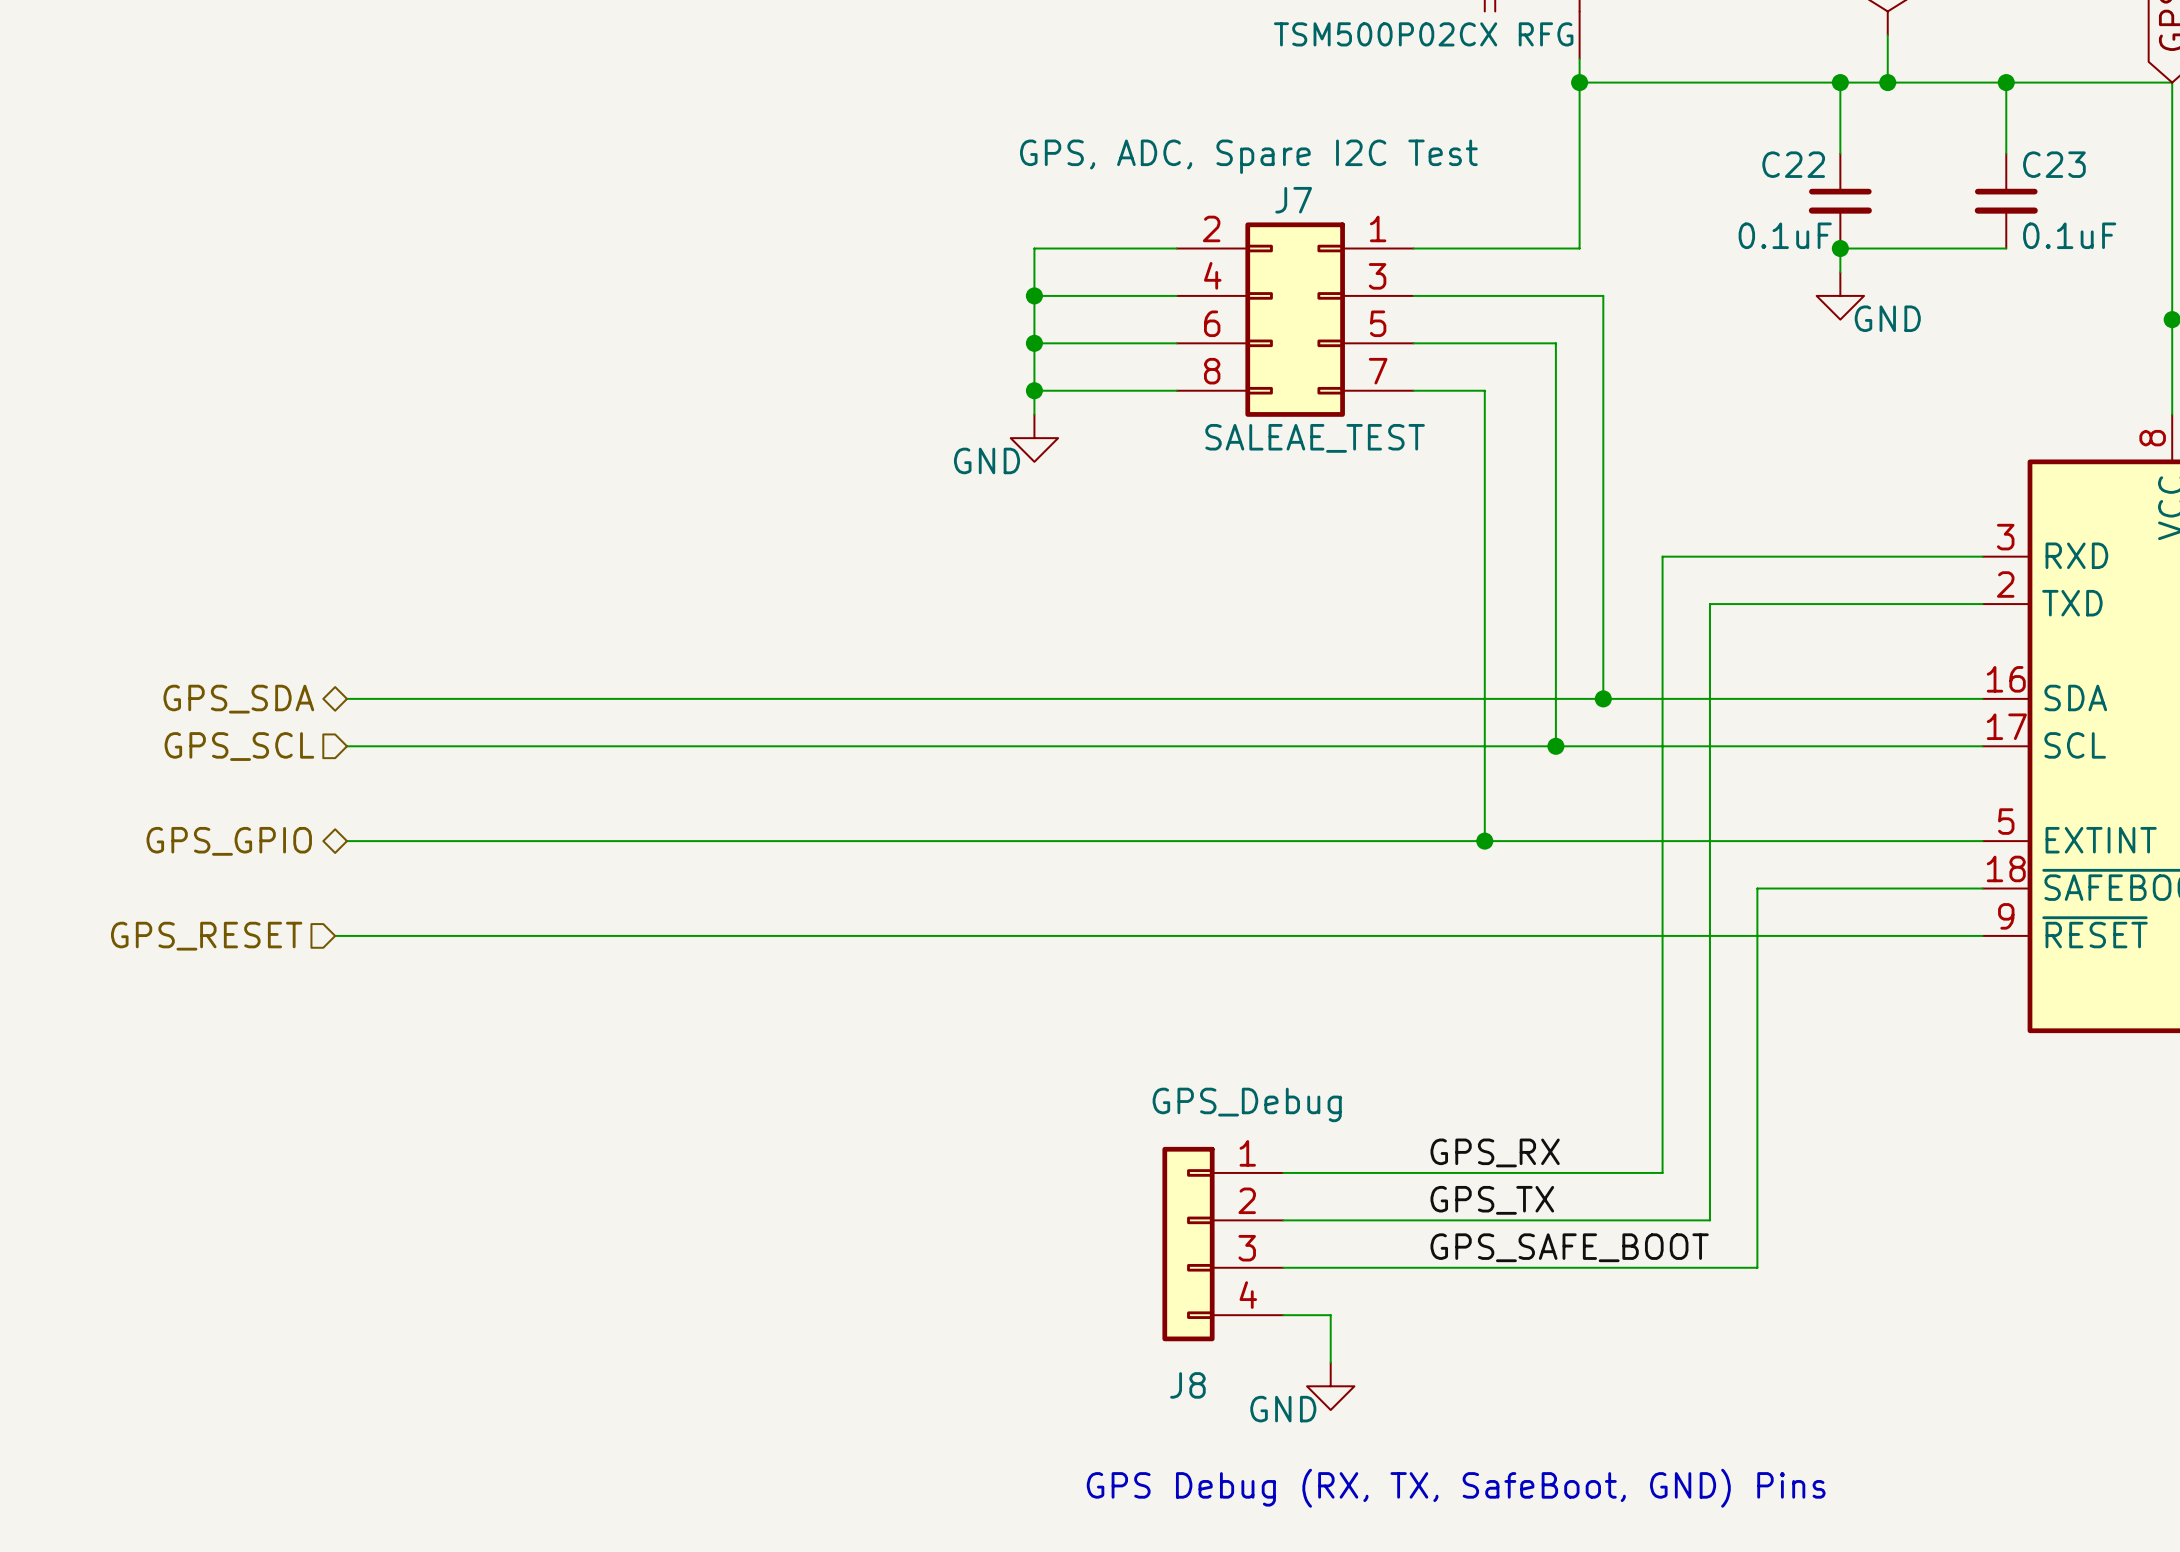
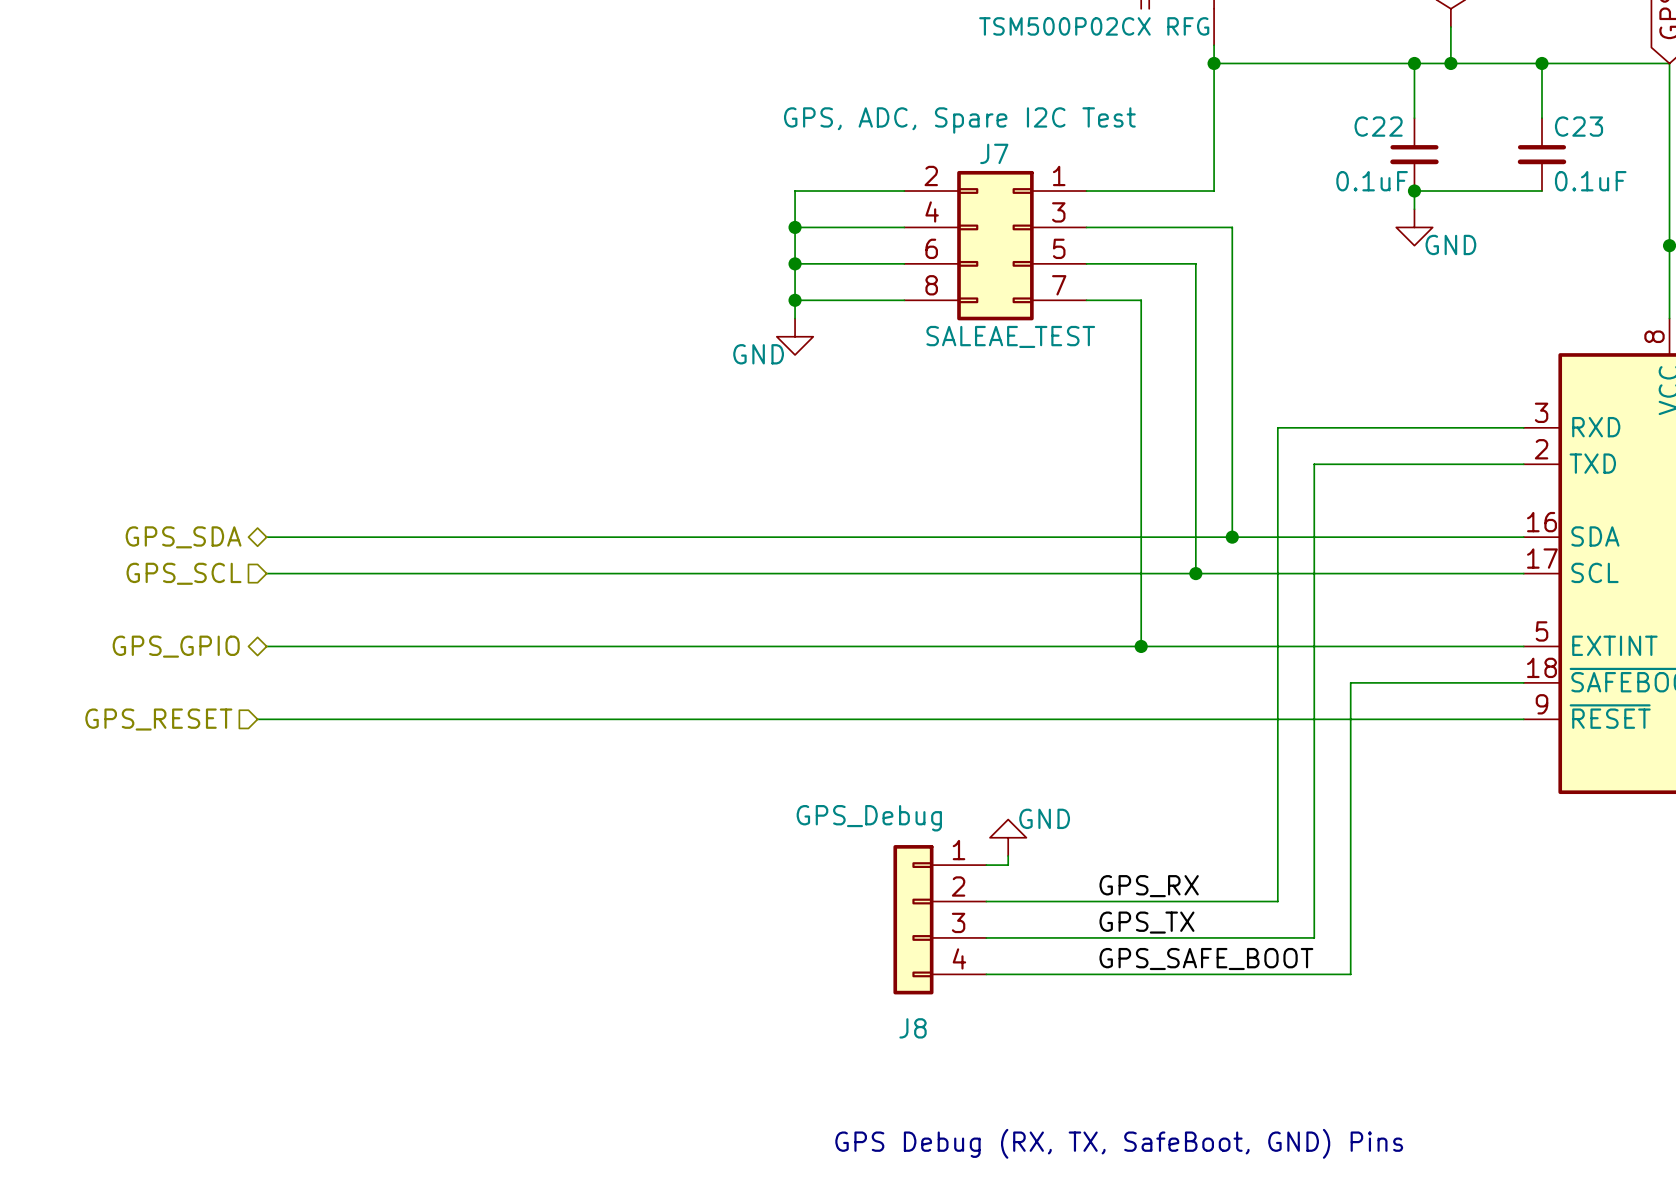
J8 value position: GPS_Debug (1247, 1104) -> GPS_Debug (869, 818)
wire: none -> (1008, 855) (1008, 865) (986, 865)
J8 position: (1222, 1244) -> (939, 919)
wire: (1283, 1315) (1330, 1315) (1330, 1362) -> none
power symbol rotation: 0° (1330, 1386) -> 180° (1008, 837)
power symbol position: GND (1330, 1386) -> GND (1008, 837)

